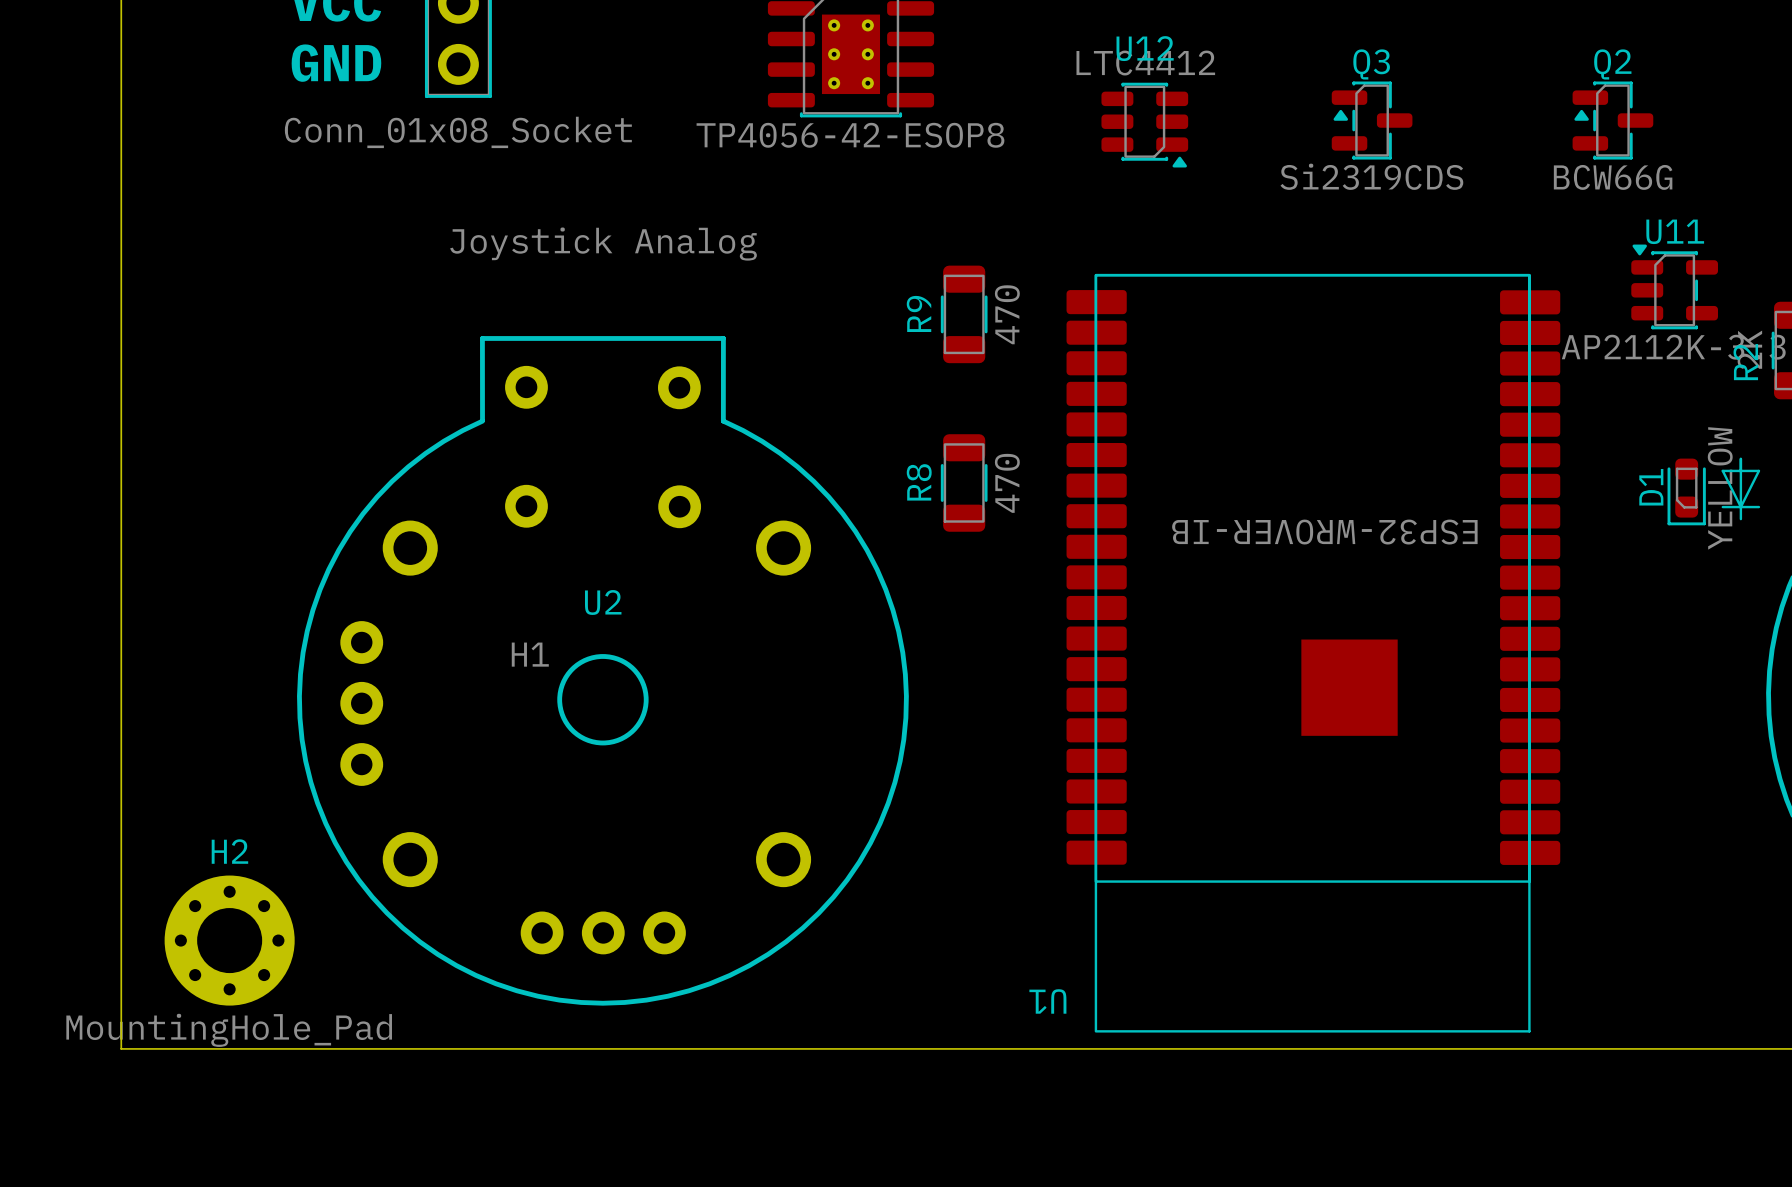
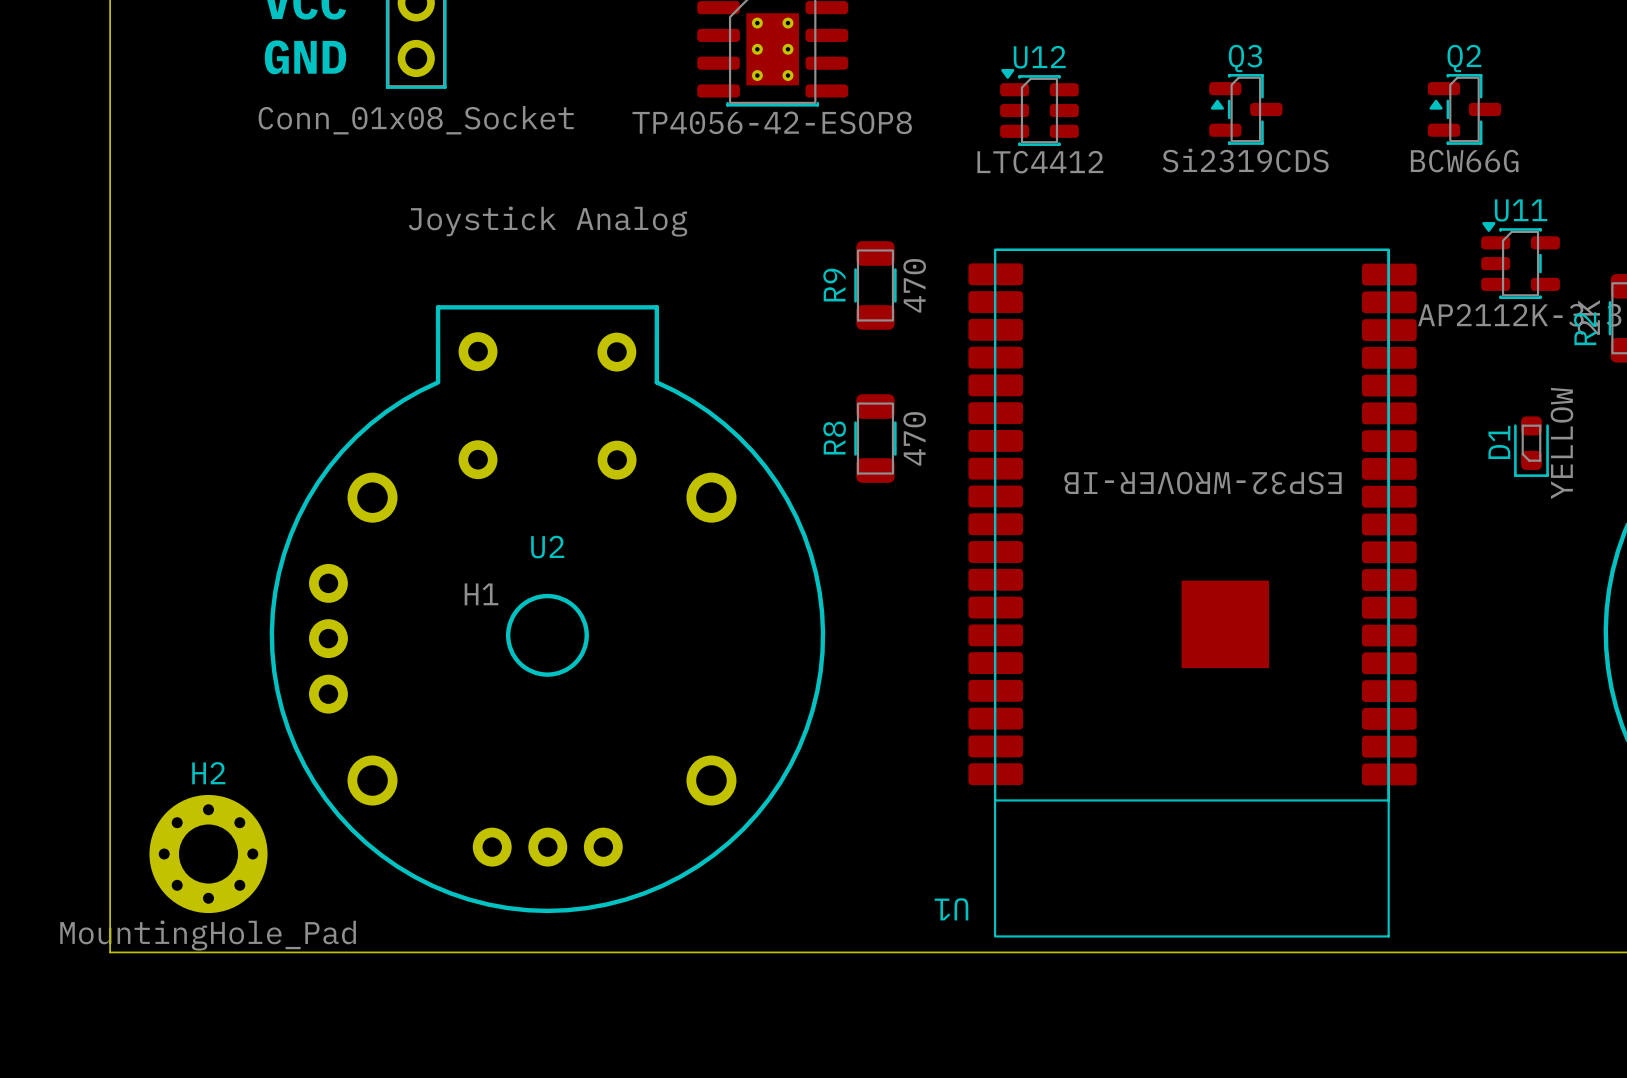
U12 rotation: 0° (1144, 125) -> 180° (1039, 107)
line: (1740, 458) (1740, 519) -> none
line: (1722, 470) (1740, 507) (1758, 470) (1722, 470) -> none
line: (1722, 507) (1758, 507) -> none

